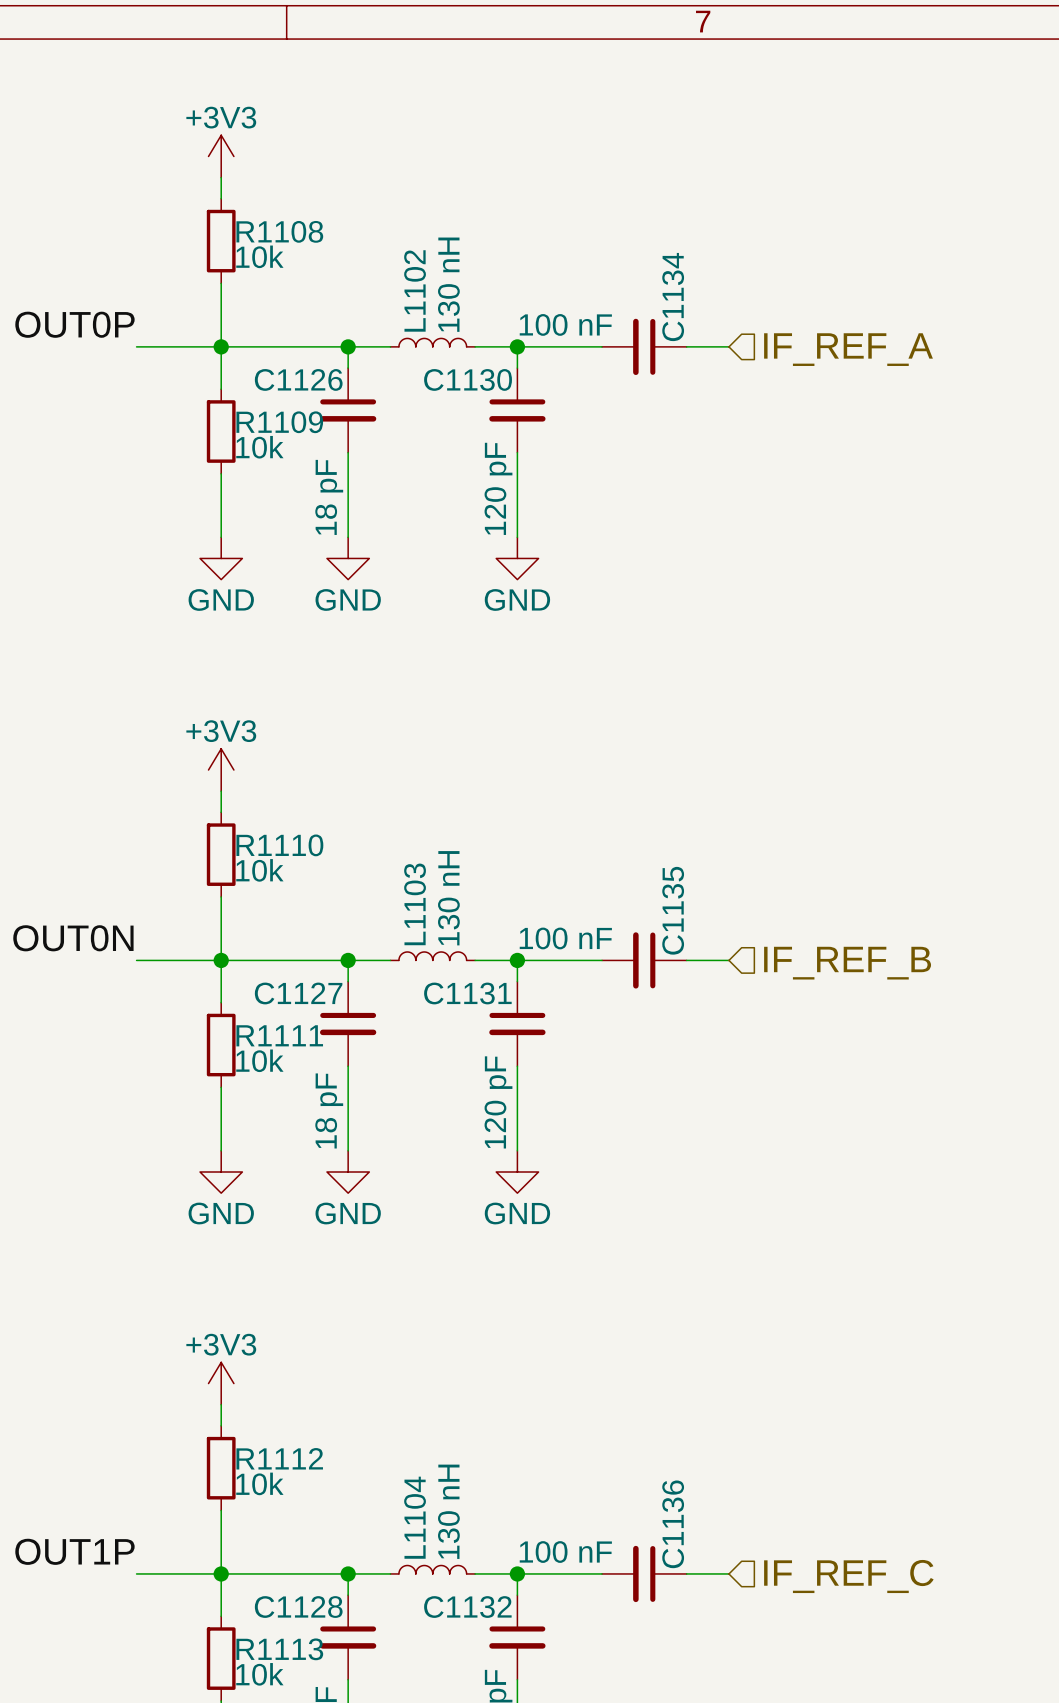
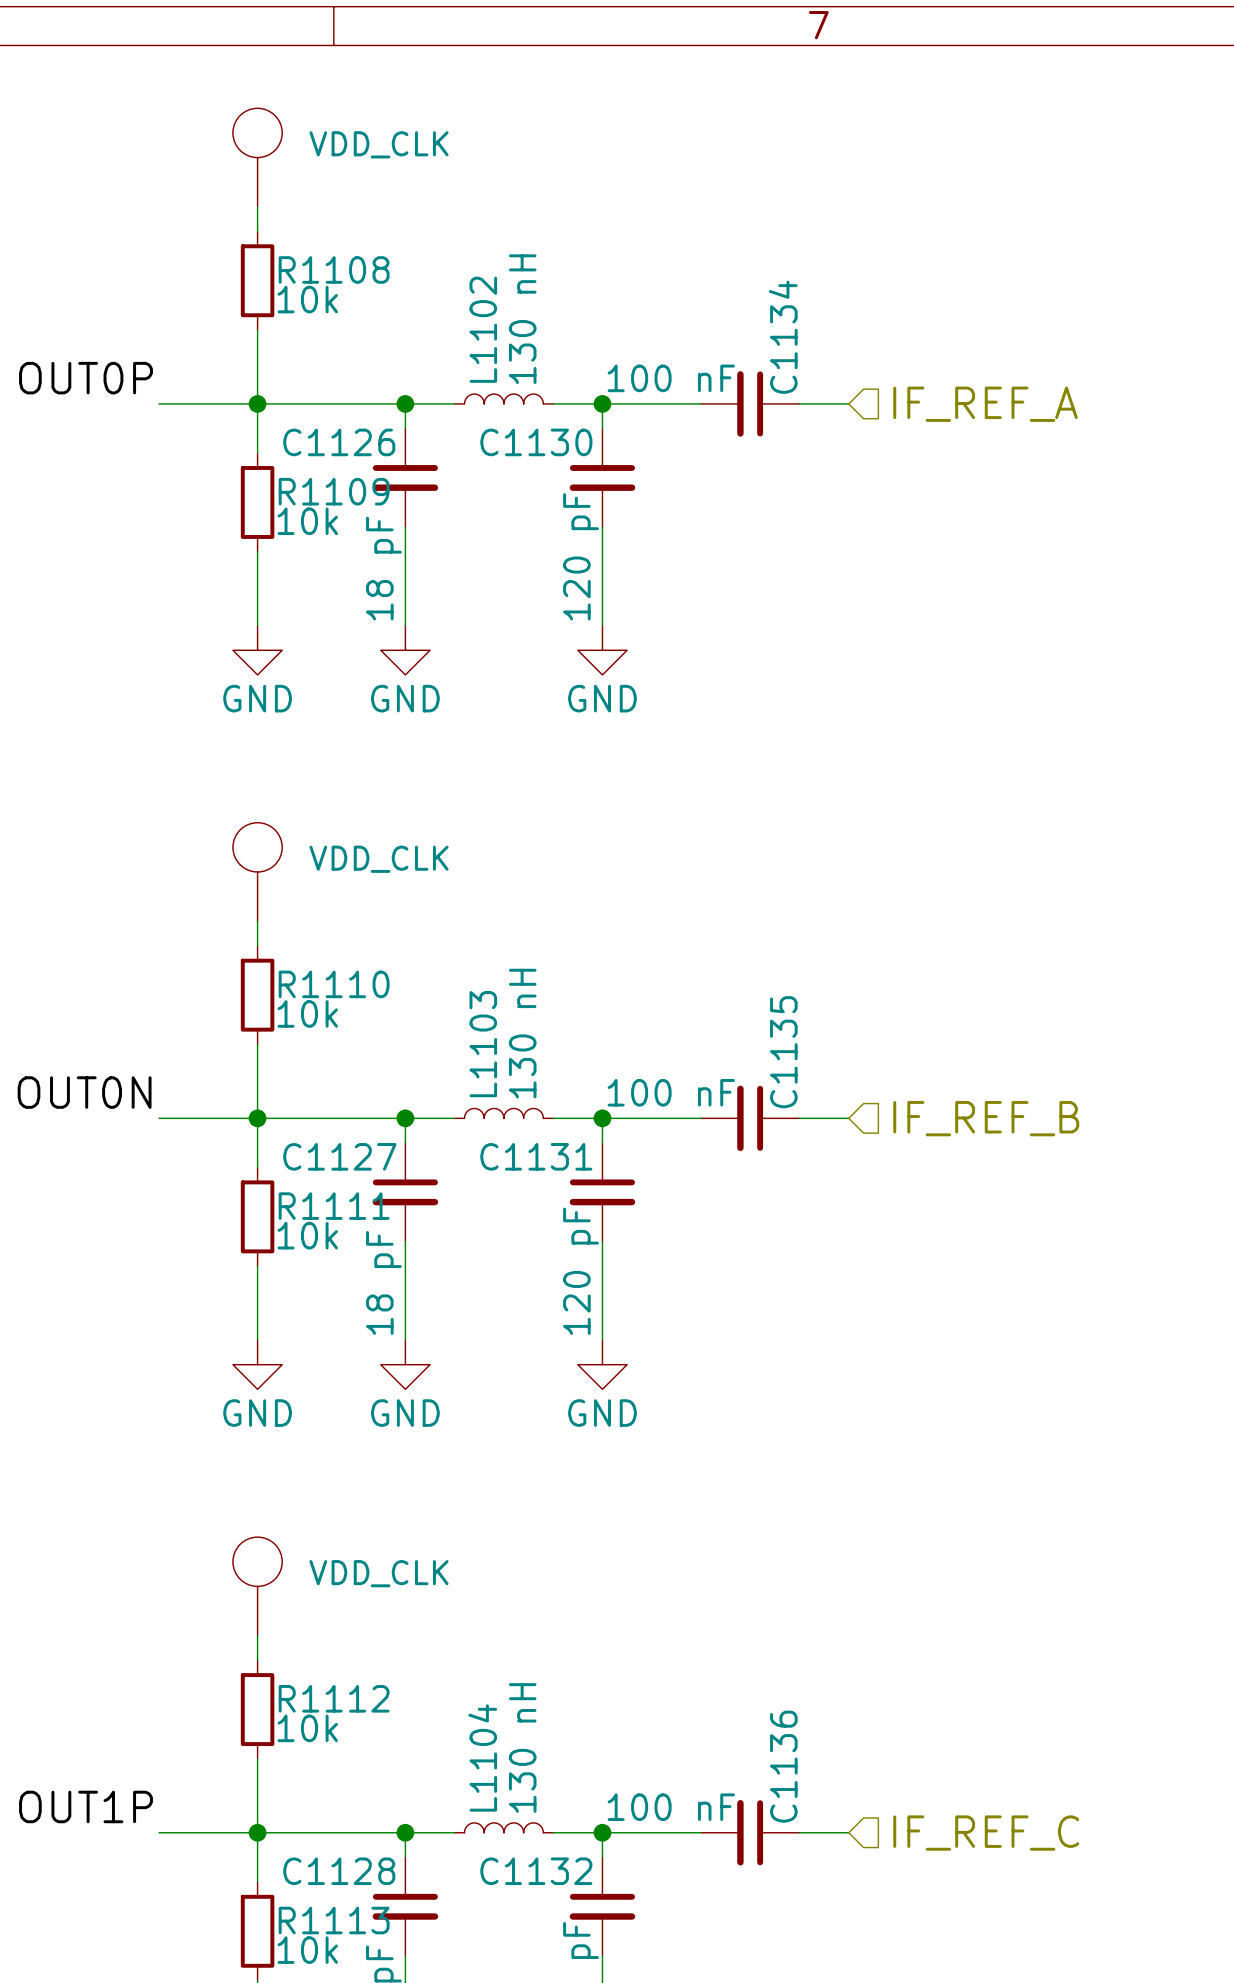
power symbol: none -> VDD_CLK (257, 157)
power symbol: +3V3 (221, 156) -> none
power symbol: none -> VDD_CLK (257, 871)
power symbol: +3V3 (221, 770) -> none
power symbol: none -> VDD_CLK (257, 1586)
power symbol: +3V3 (221, 1383) -> none

